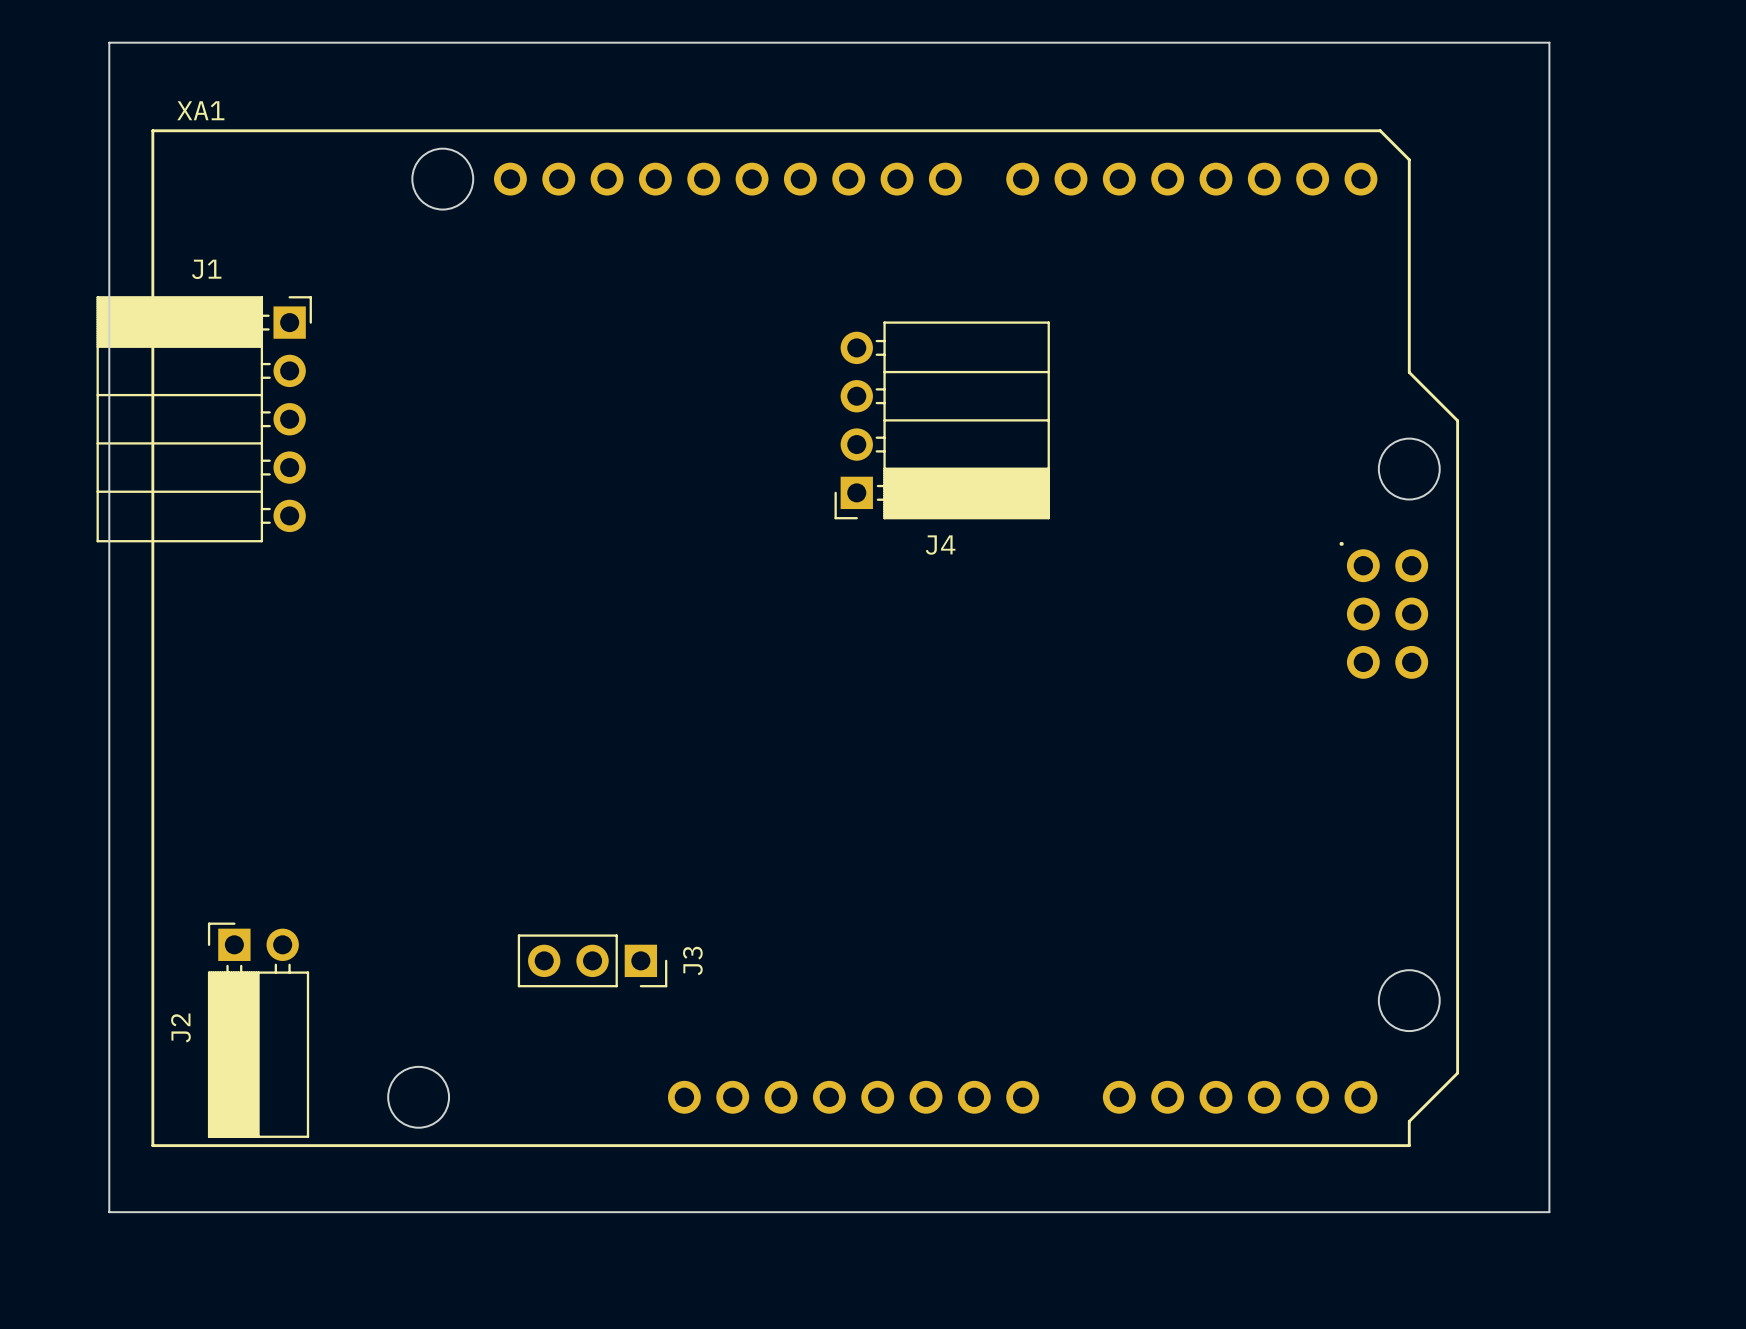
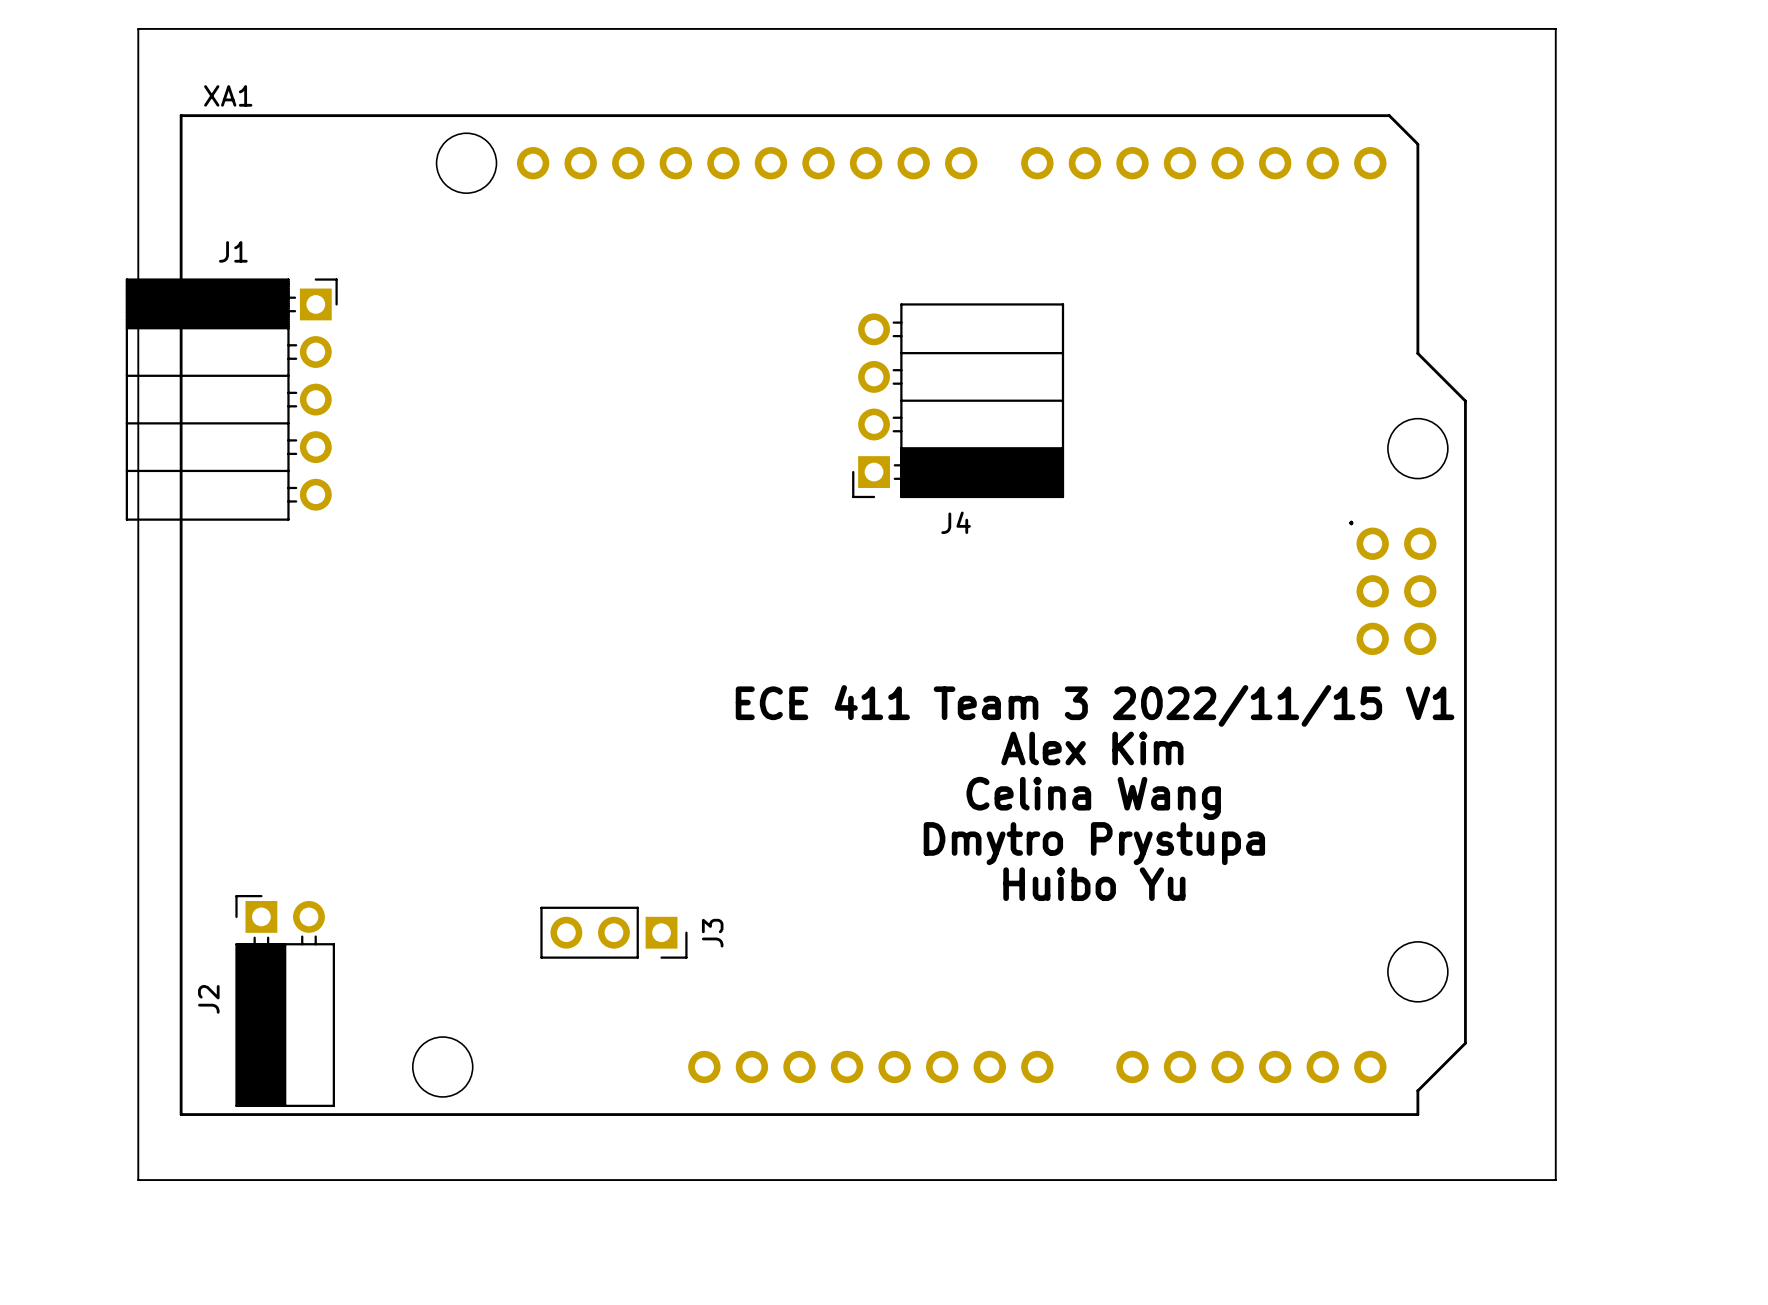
text: none -> ECE 411 Team 3 2022/11/15 V1 (1095, 705)
text: none -> Alex Kim (1092, 748)
text: none -> Celina Wang (1093, 798)
text: none -> Dmytro Prystupa (1094, 843)
text: none -> Huibo Yu (1094, 884)

